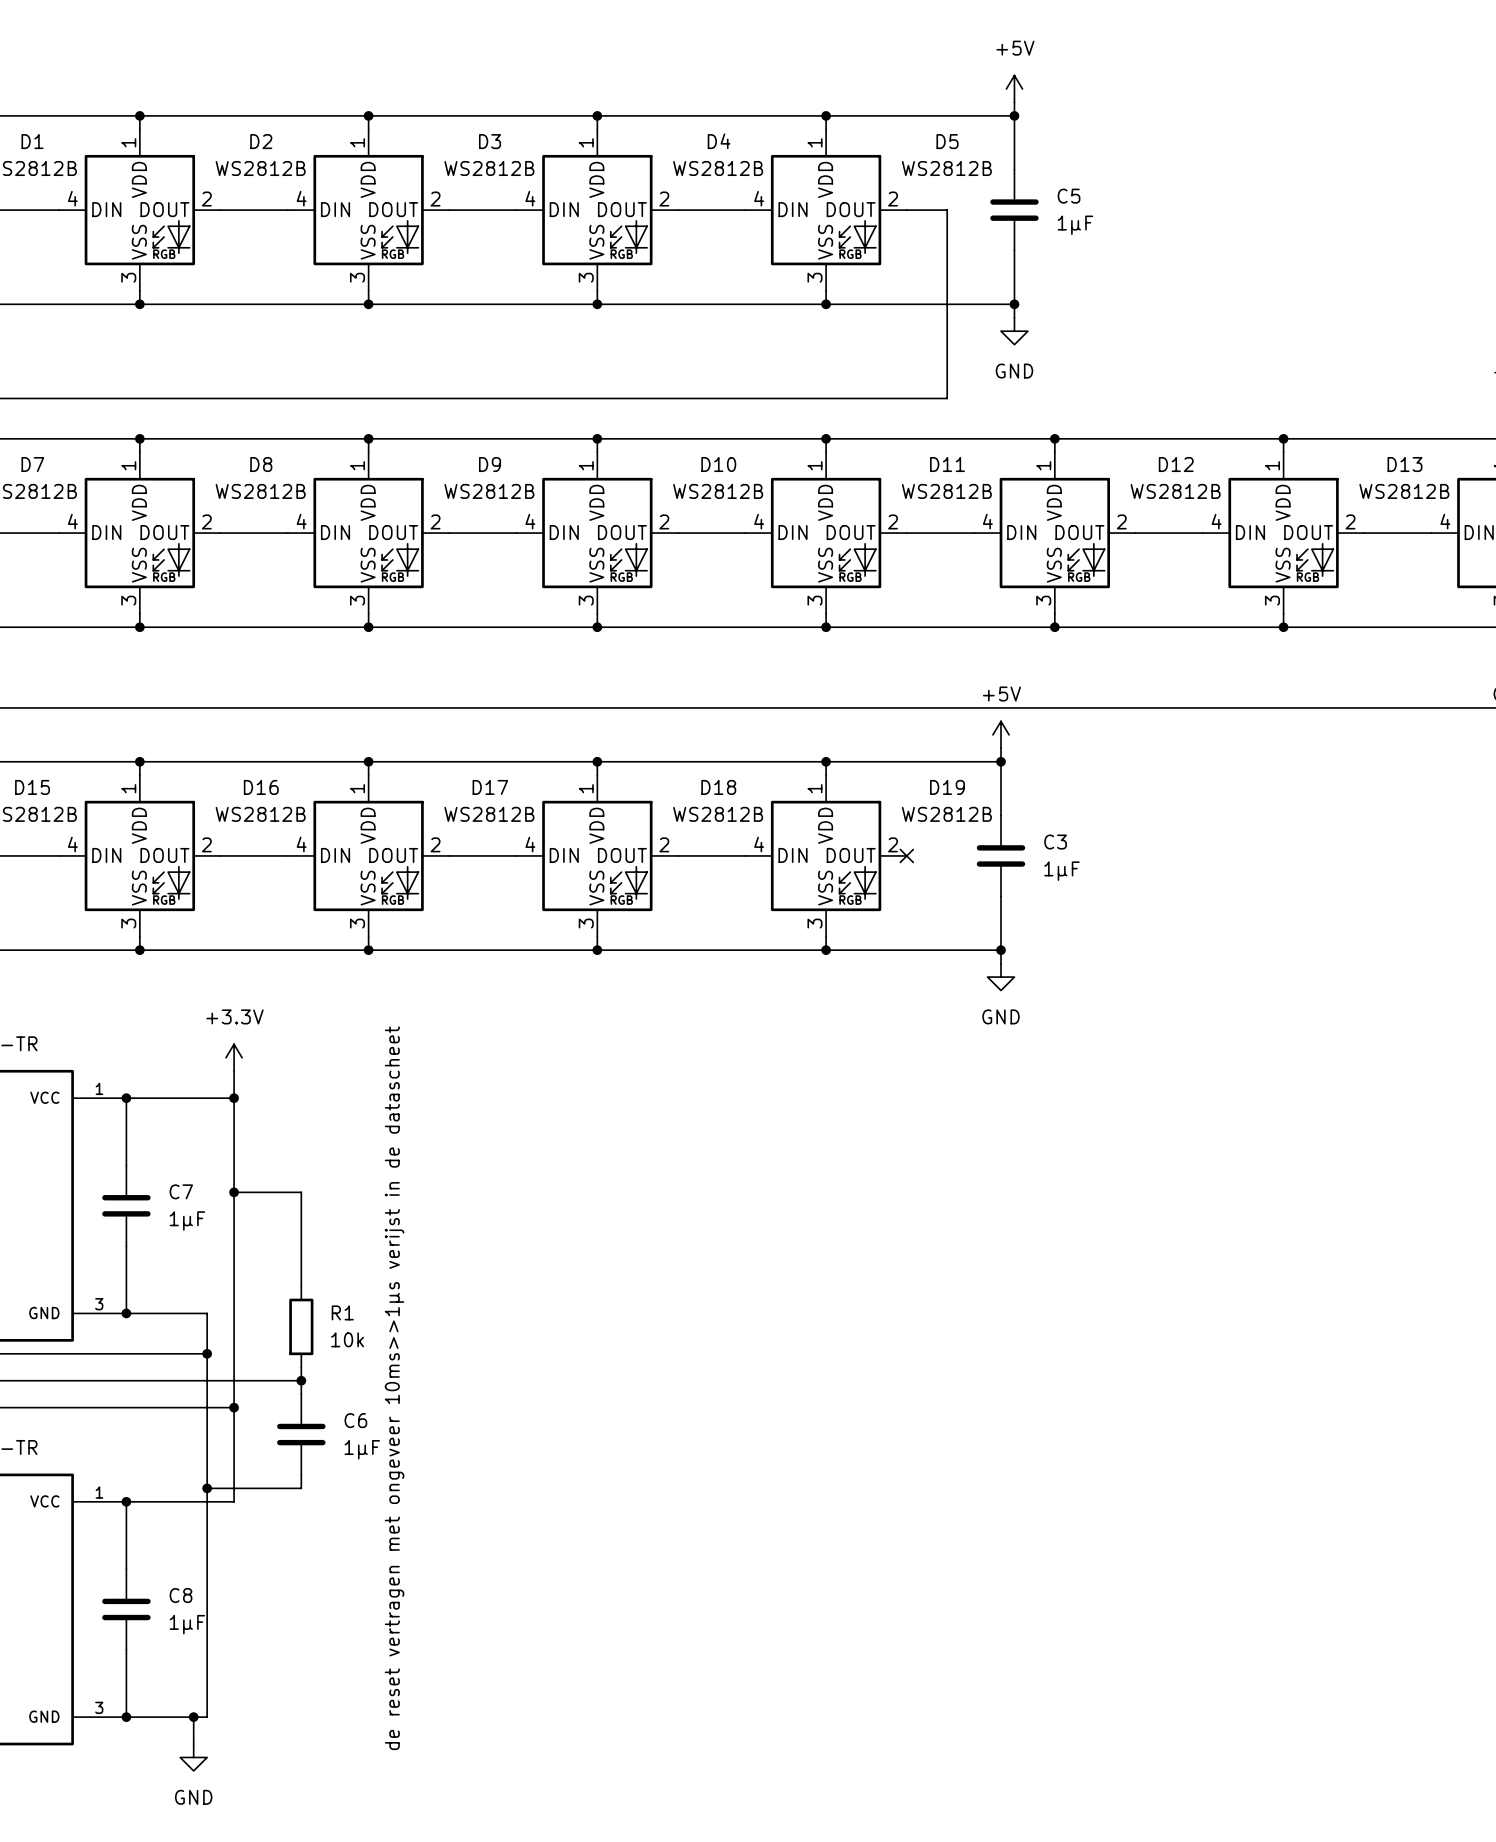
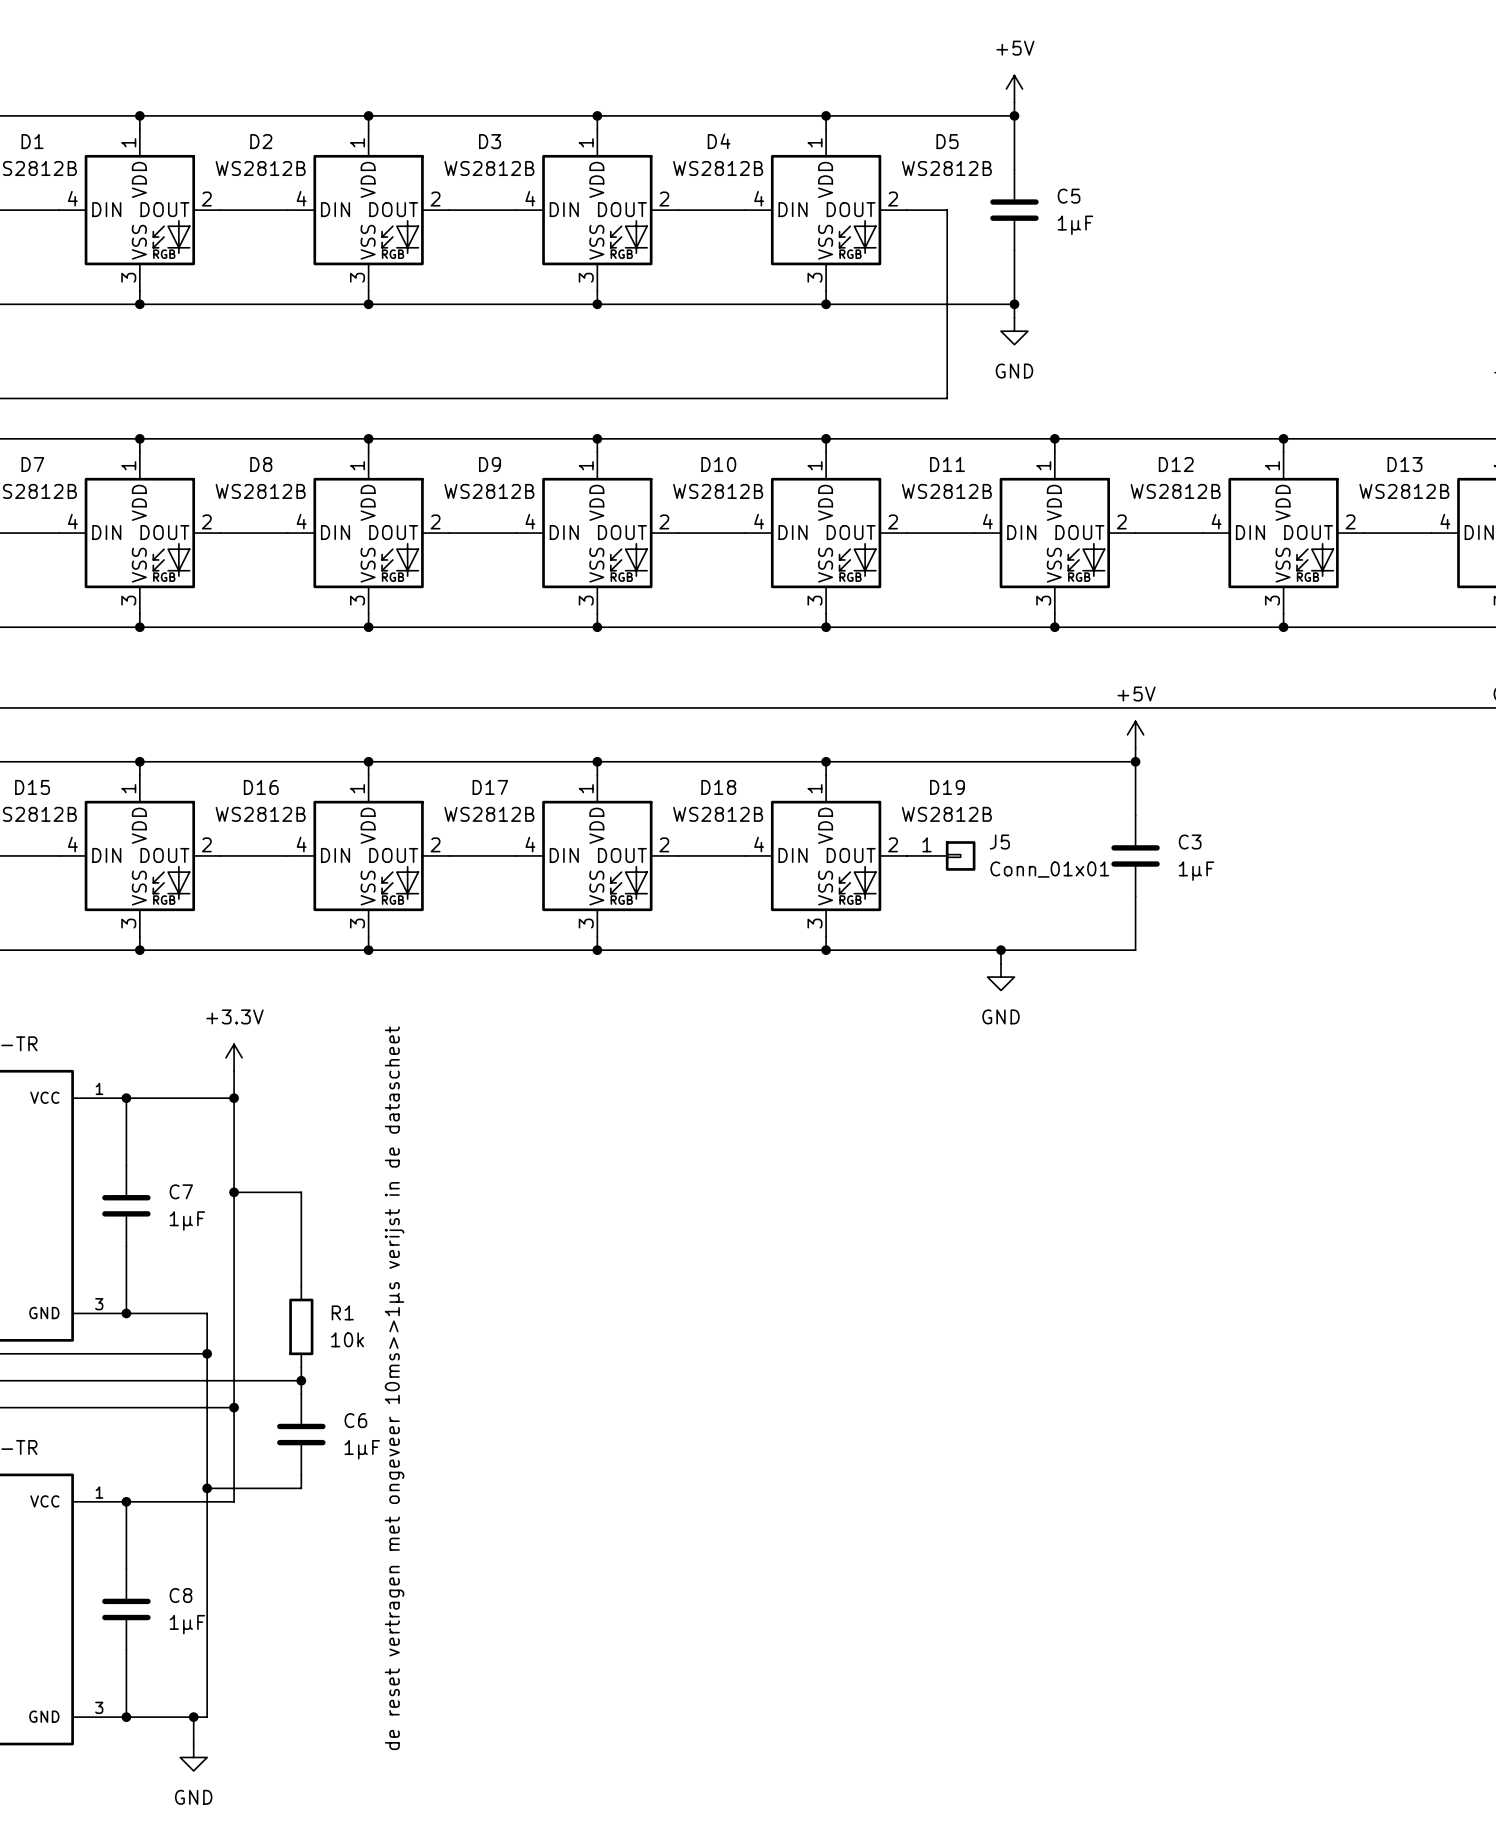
power symbol position: +5V (1001, 734) -> +5V (1135, 734)
wire: (1001, 748) (1001, 815) -> (1135, 748) (1135, 815)
wire: none -> (1001, 761) (1135, 761)
junction: (1001, 761) -> none
junction: none -> (1135, 761)
no-connect mark: (906, 855) -> none
J5: none -> Conn_01x01 (941, 855)
C3 position: (1001, 855) -> (1135, 855)
wire: (1001, 896) (1001, 950) -> (1135, 896) (1135, 950) (1001, 950)

